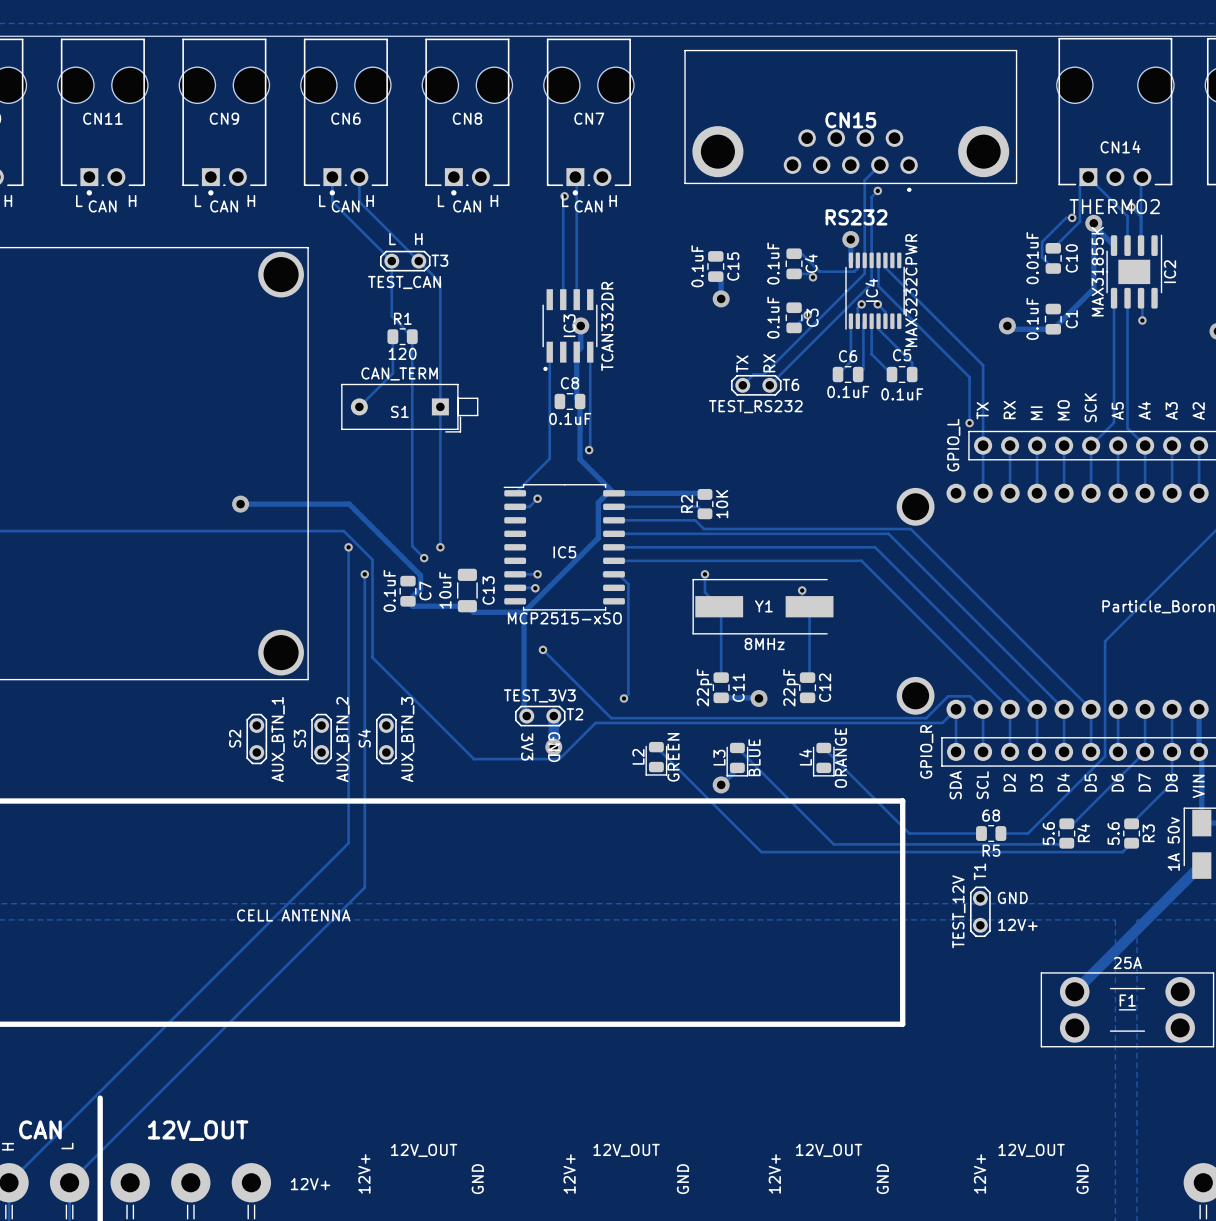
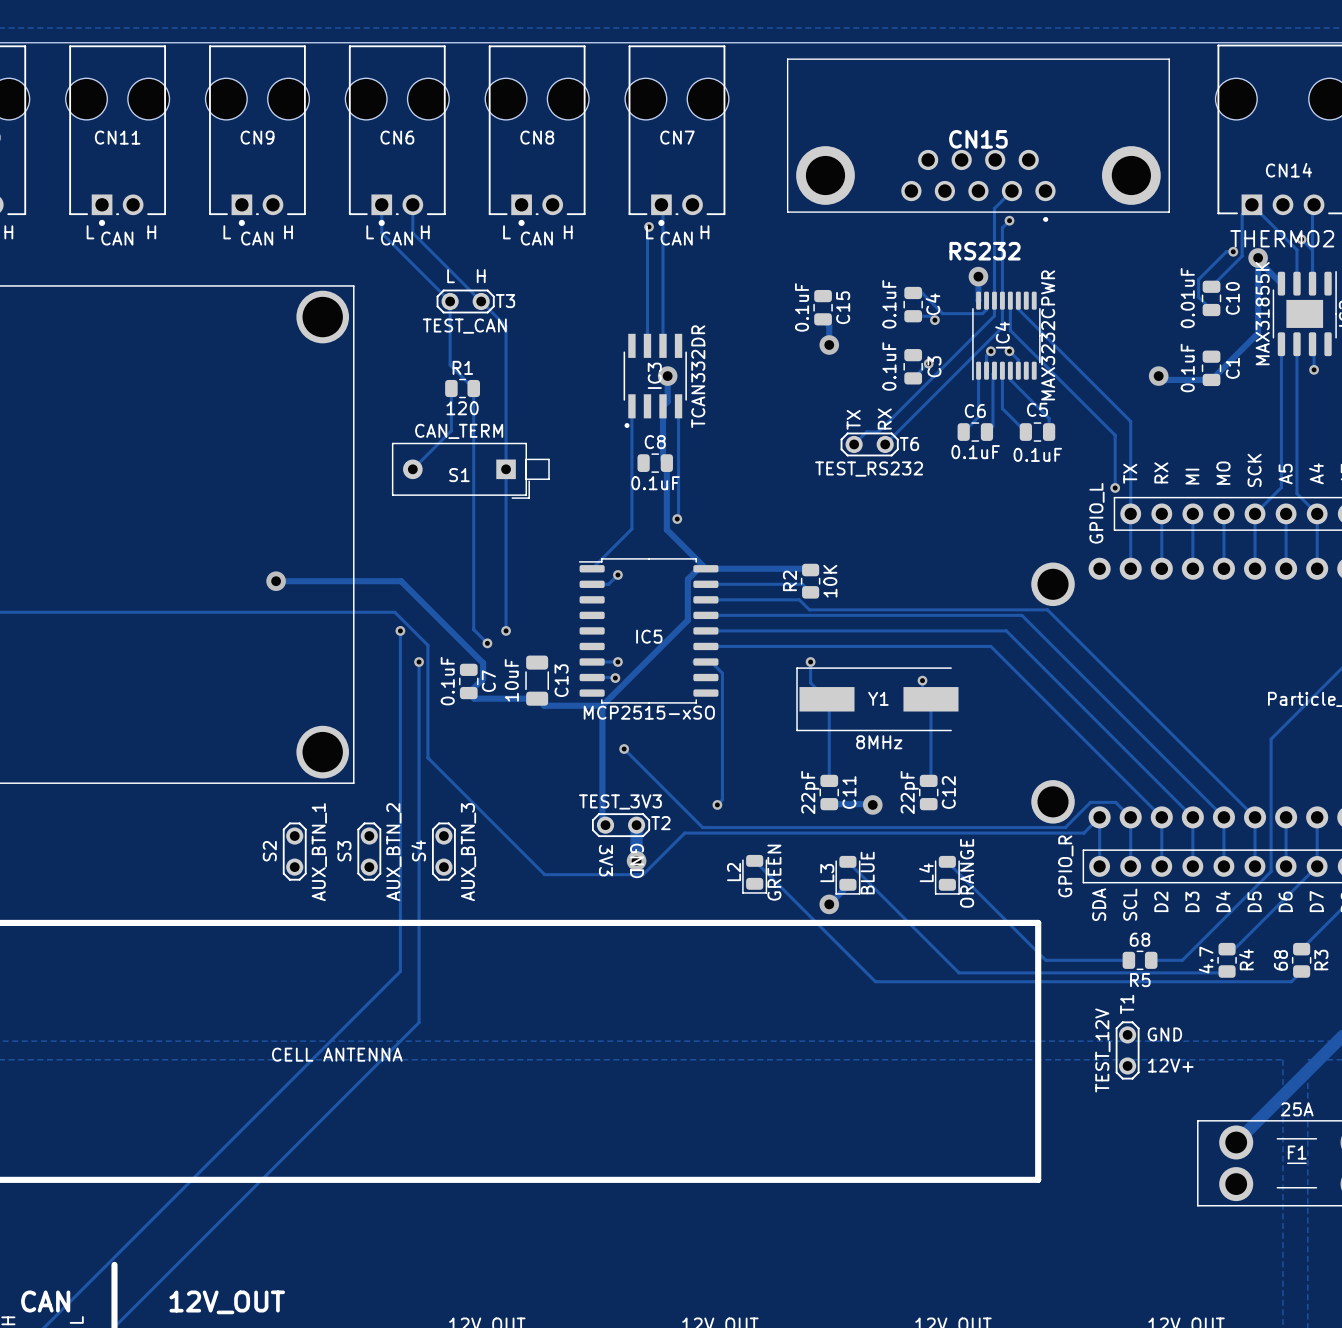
R4 value: 5.6 (1048, 833) -> 4.7 (1206, 960)
R3 value: 5.6 (1113, 833) -> 68 (1280, 960)

